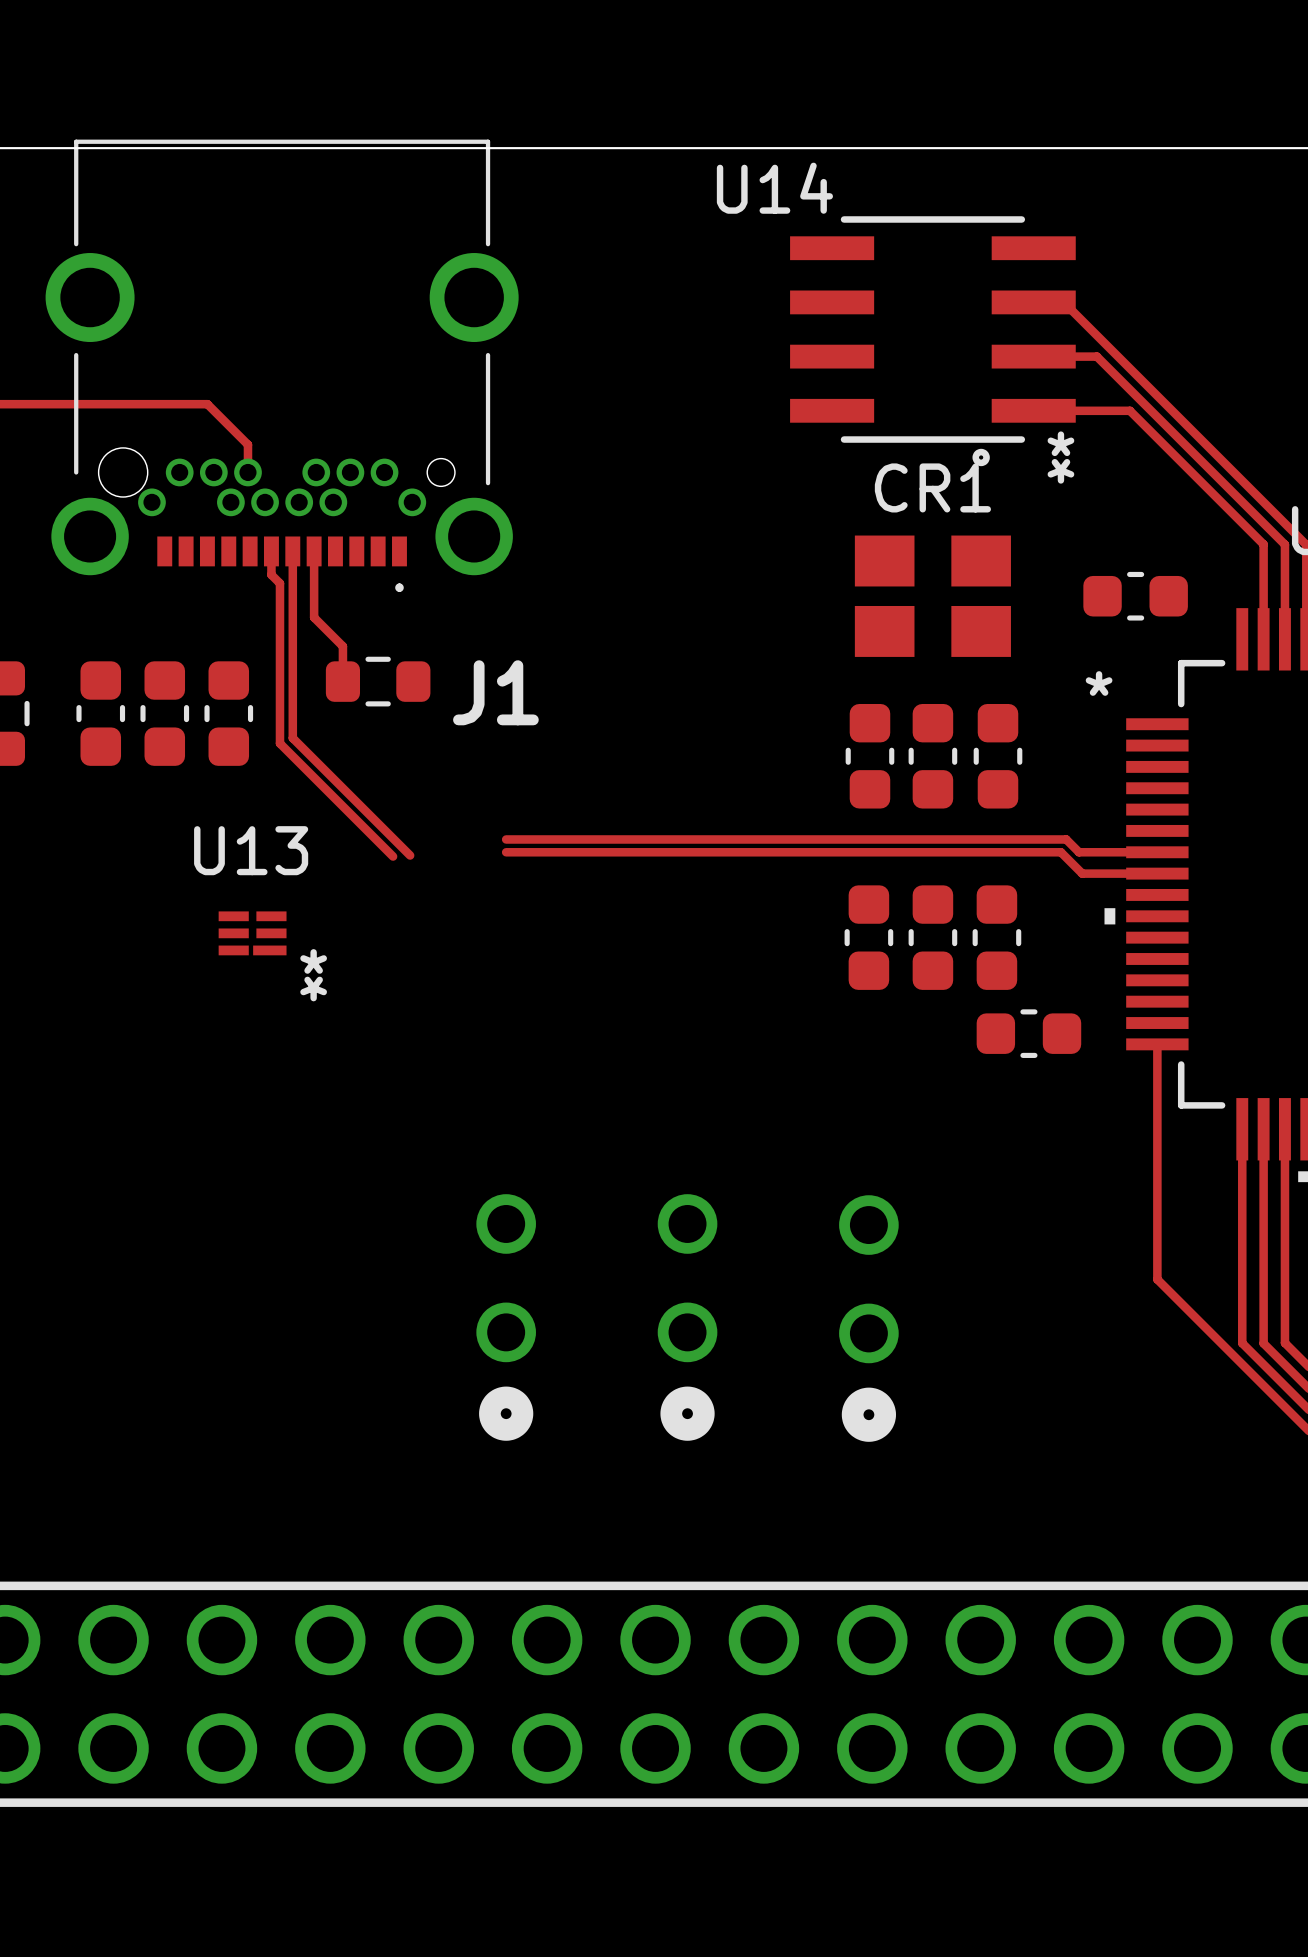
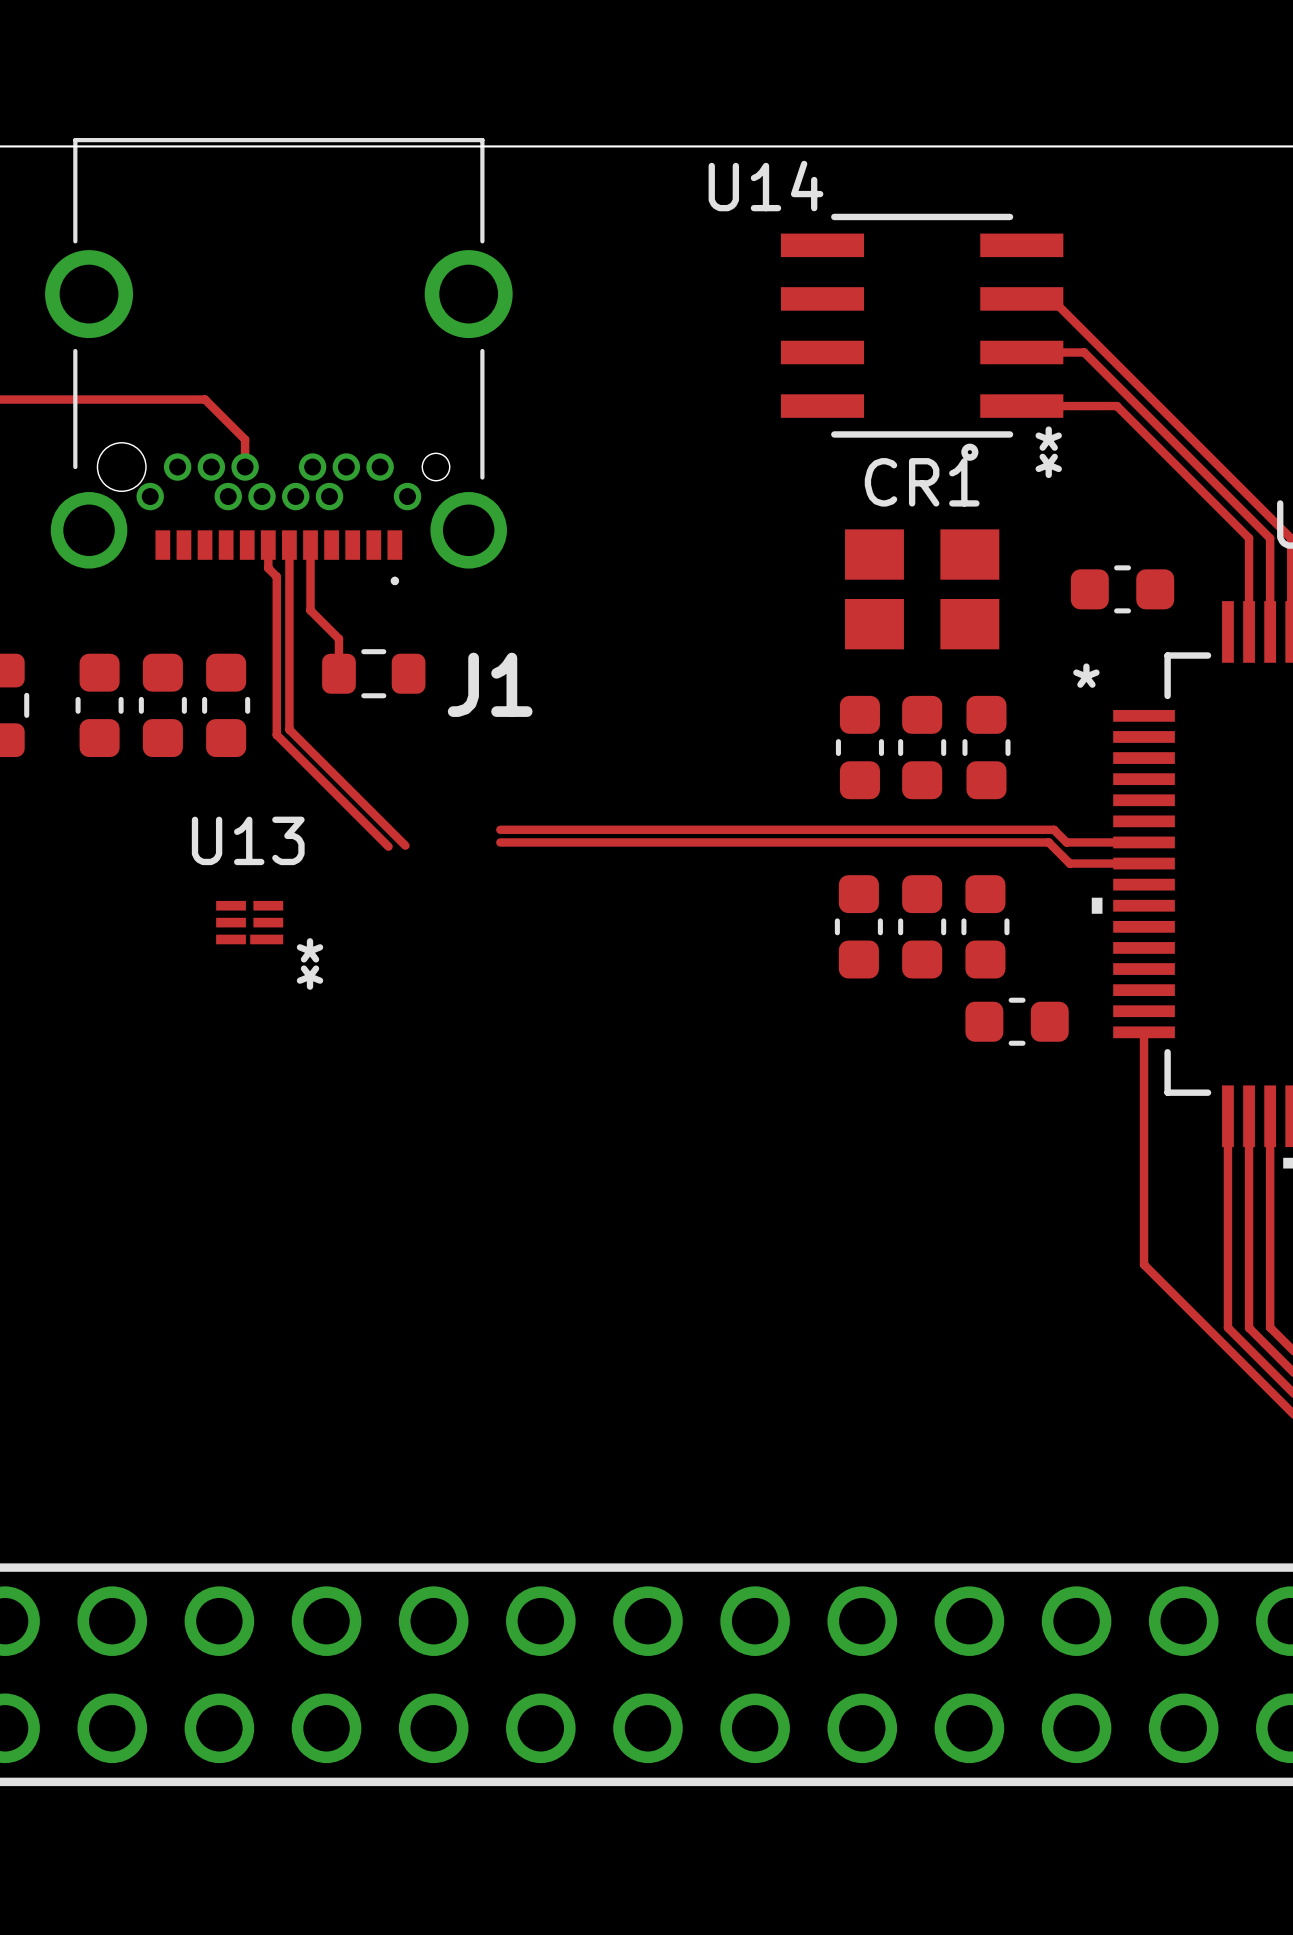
part: (506, 1317) -> none
part: (687, 1317) -> none
part: (868, 1318) -> none

